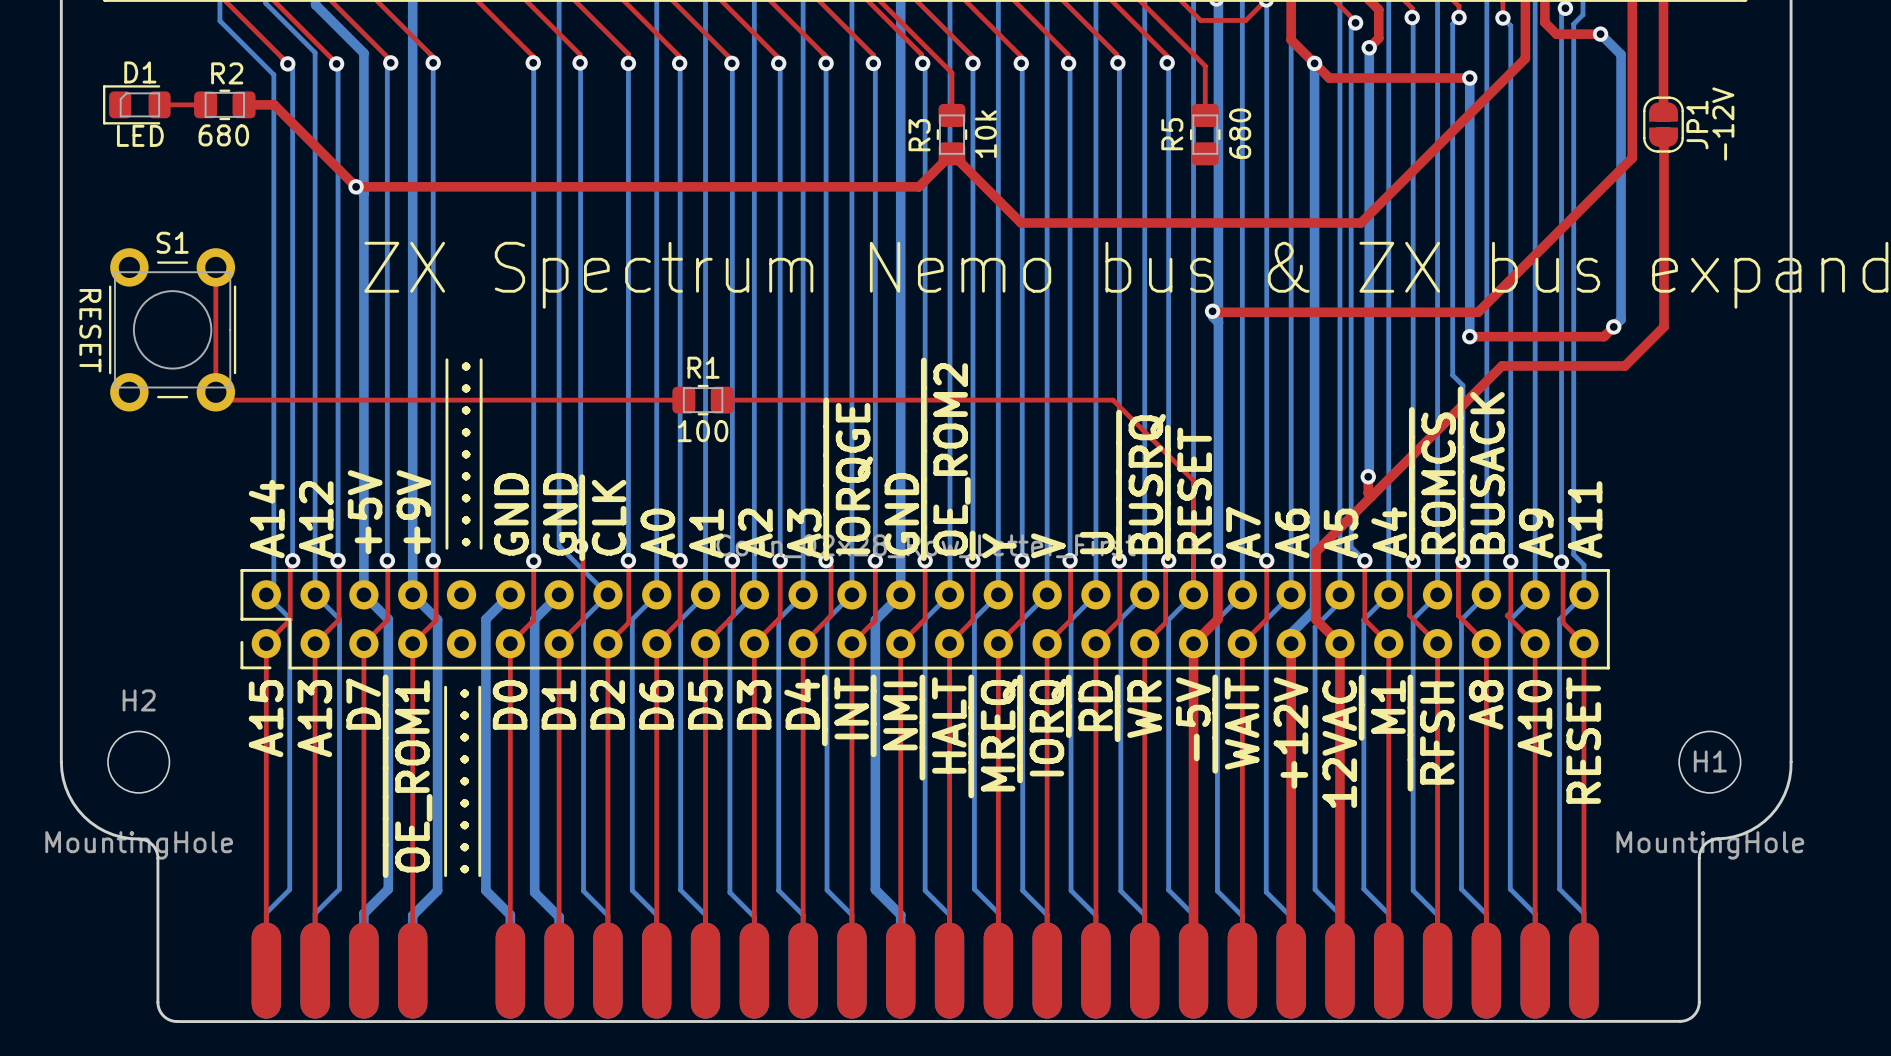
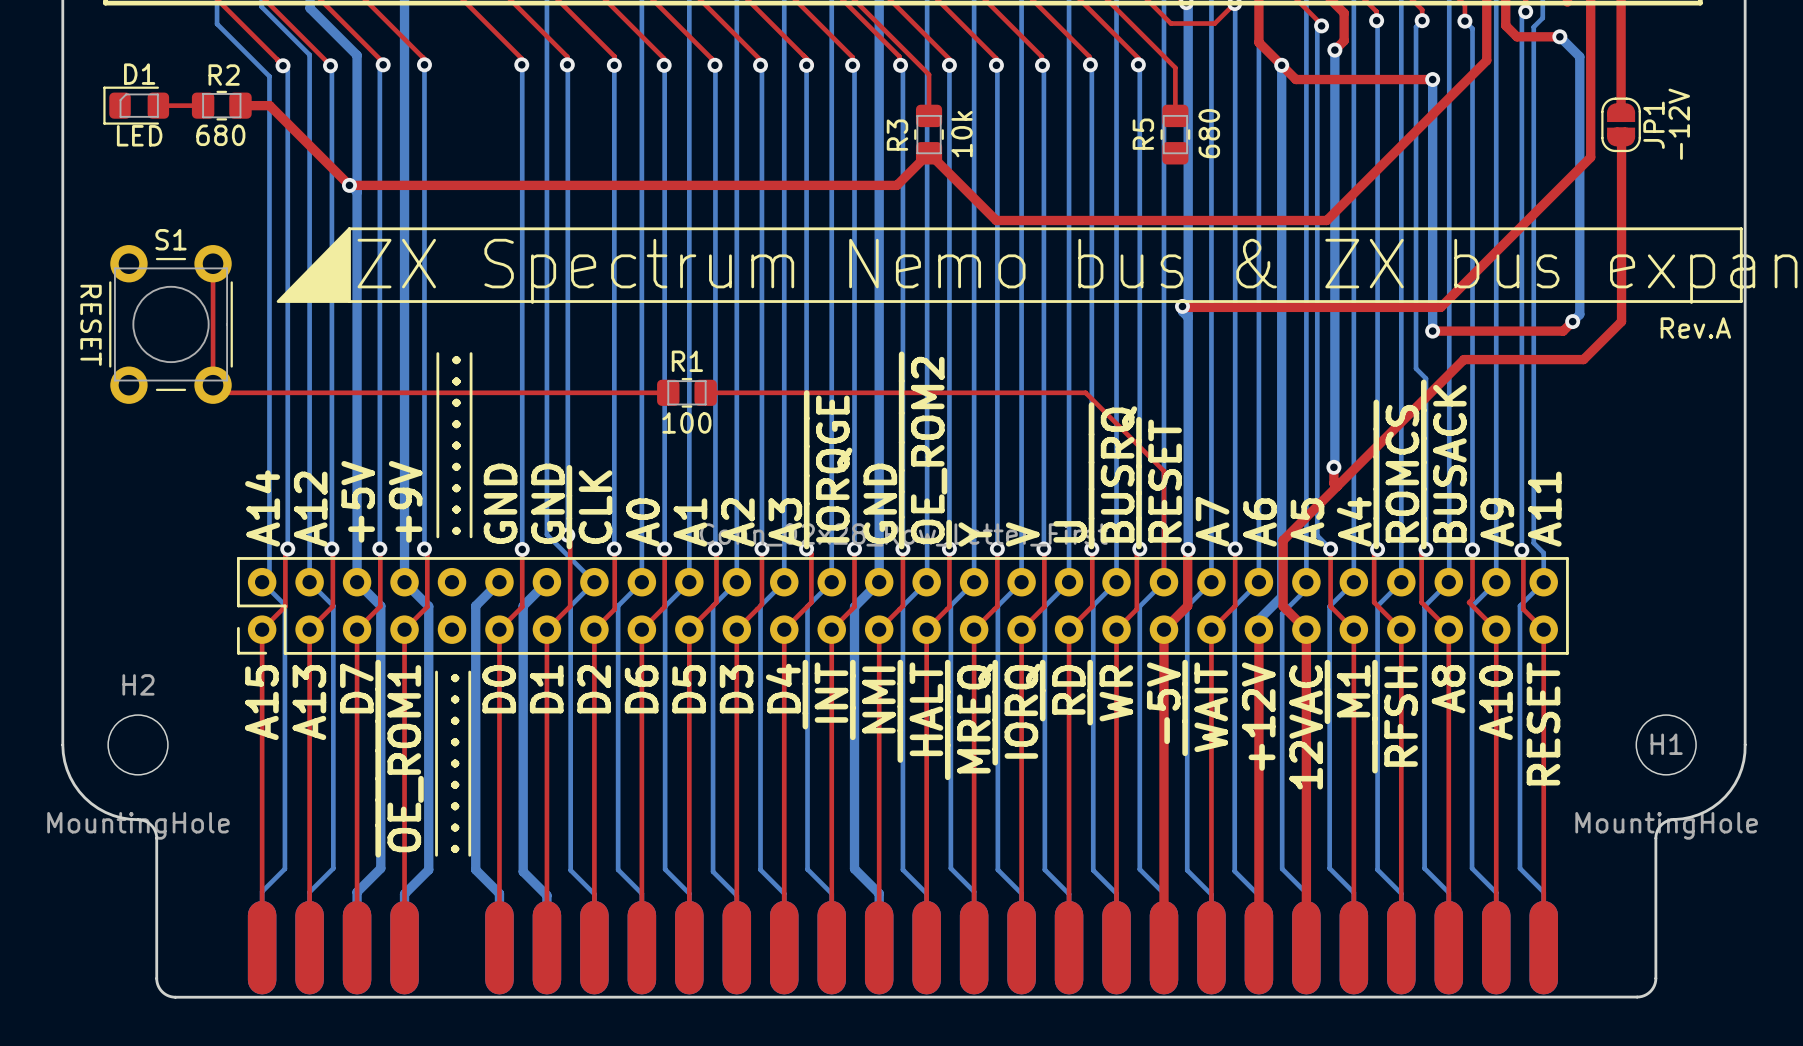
drawing: none -> [276, 227, 351, 303]
line: none -> (349, 228) (1741, 228) (1741, 301) (349, 301) (349, 228)
text: none -> Rev.A (1695, 328)

